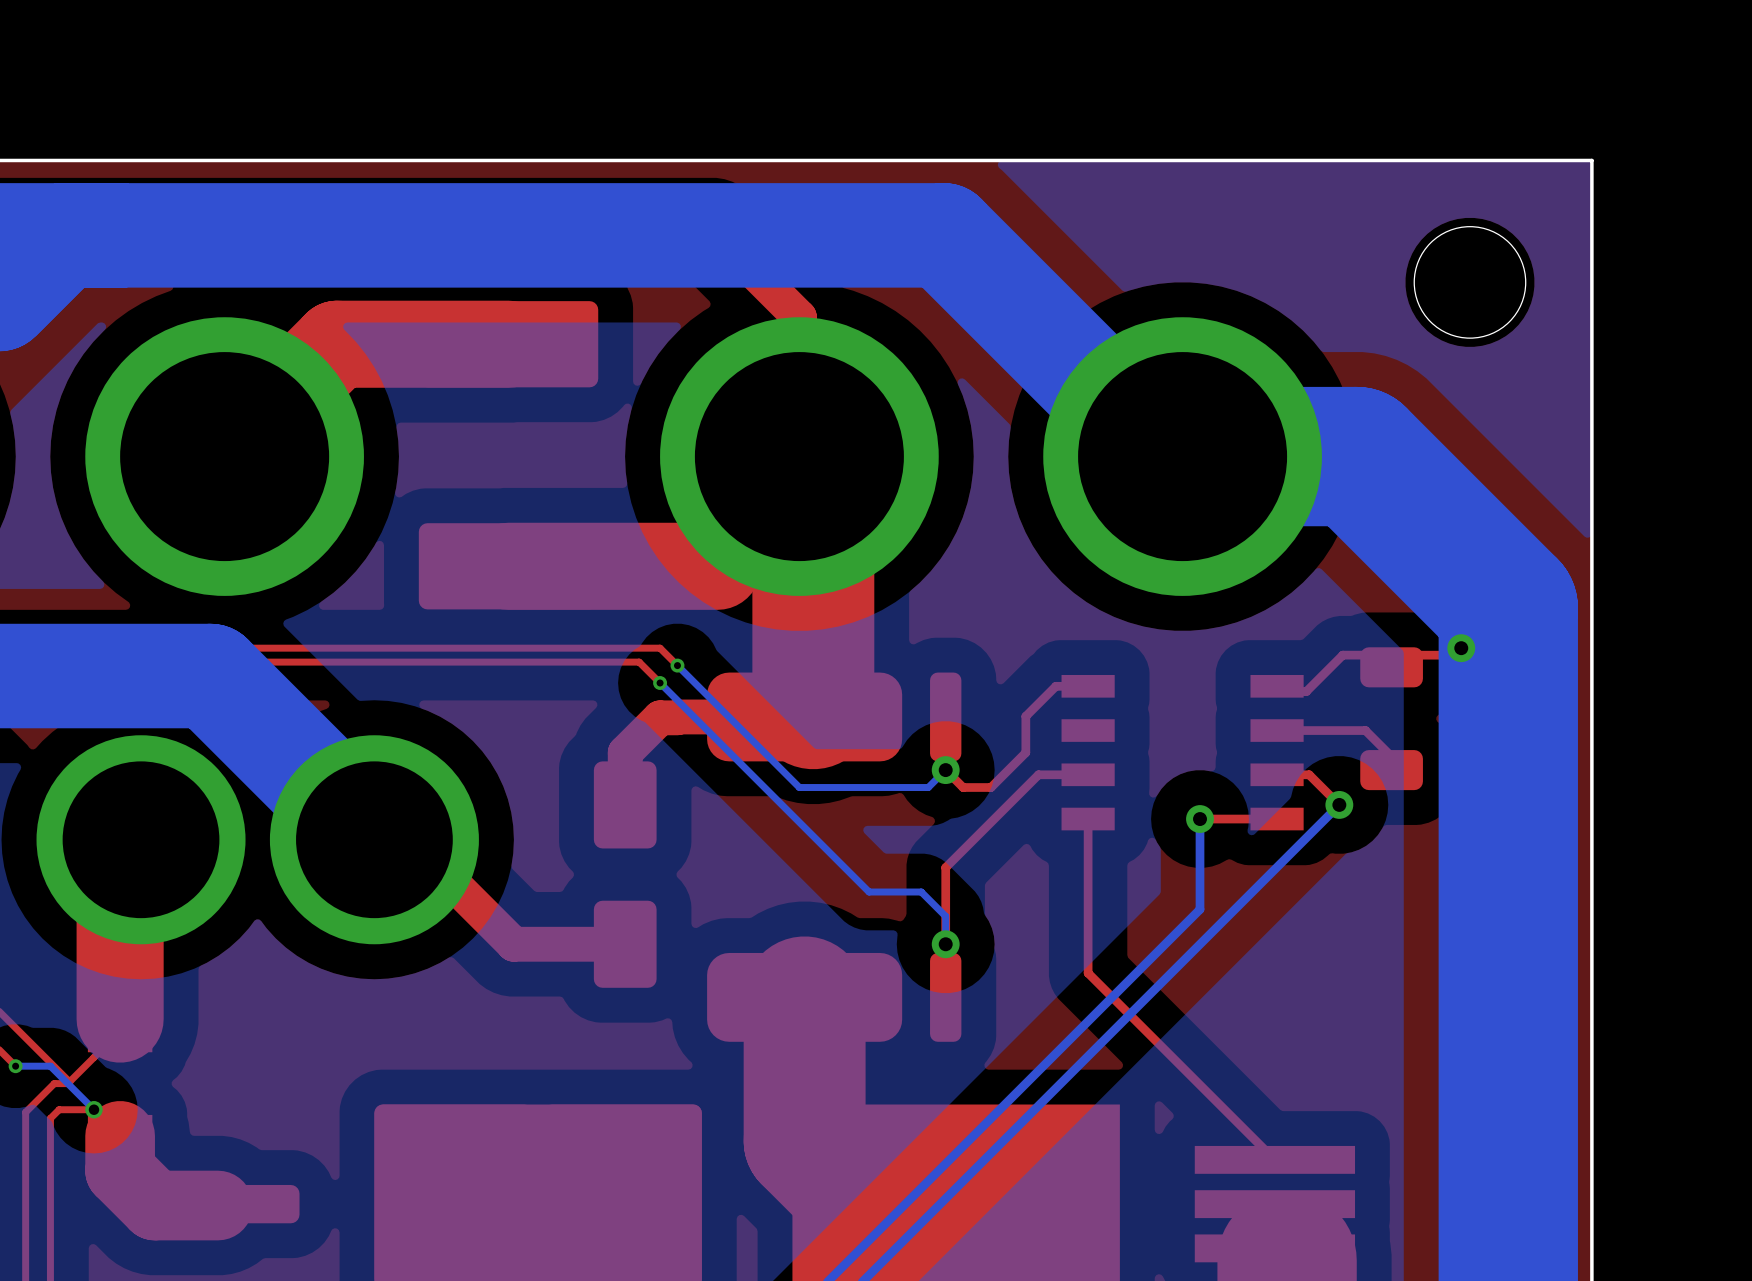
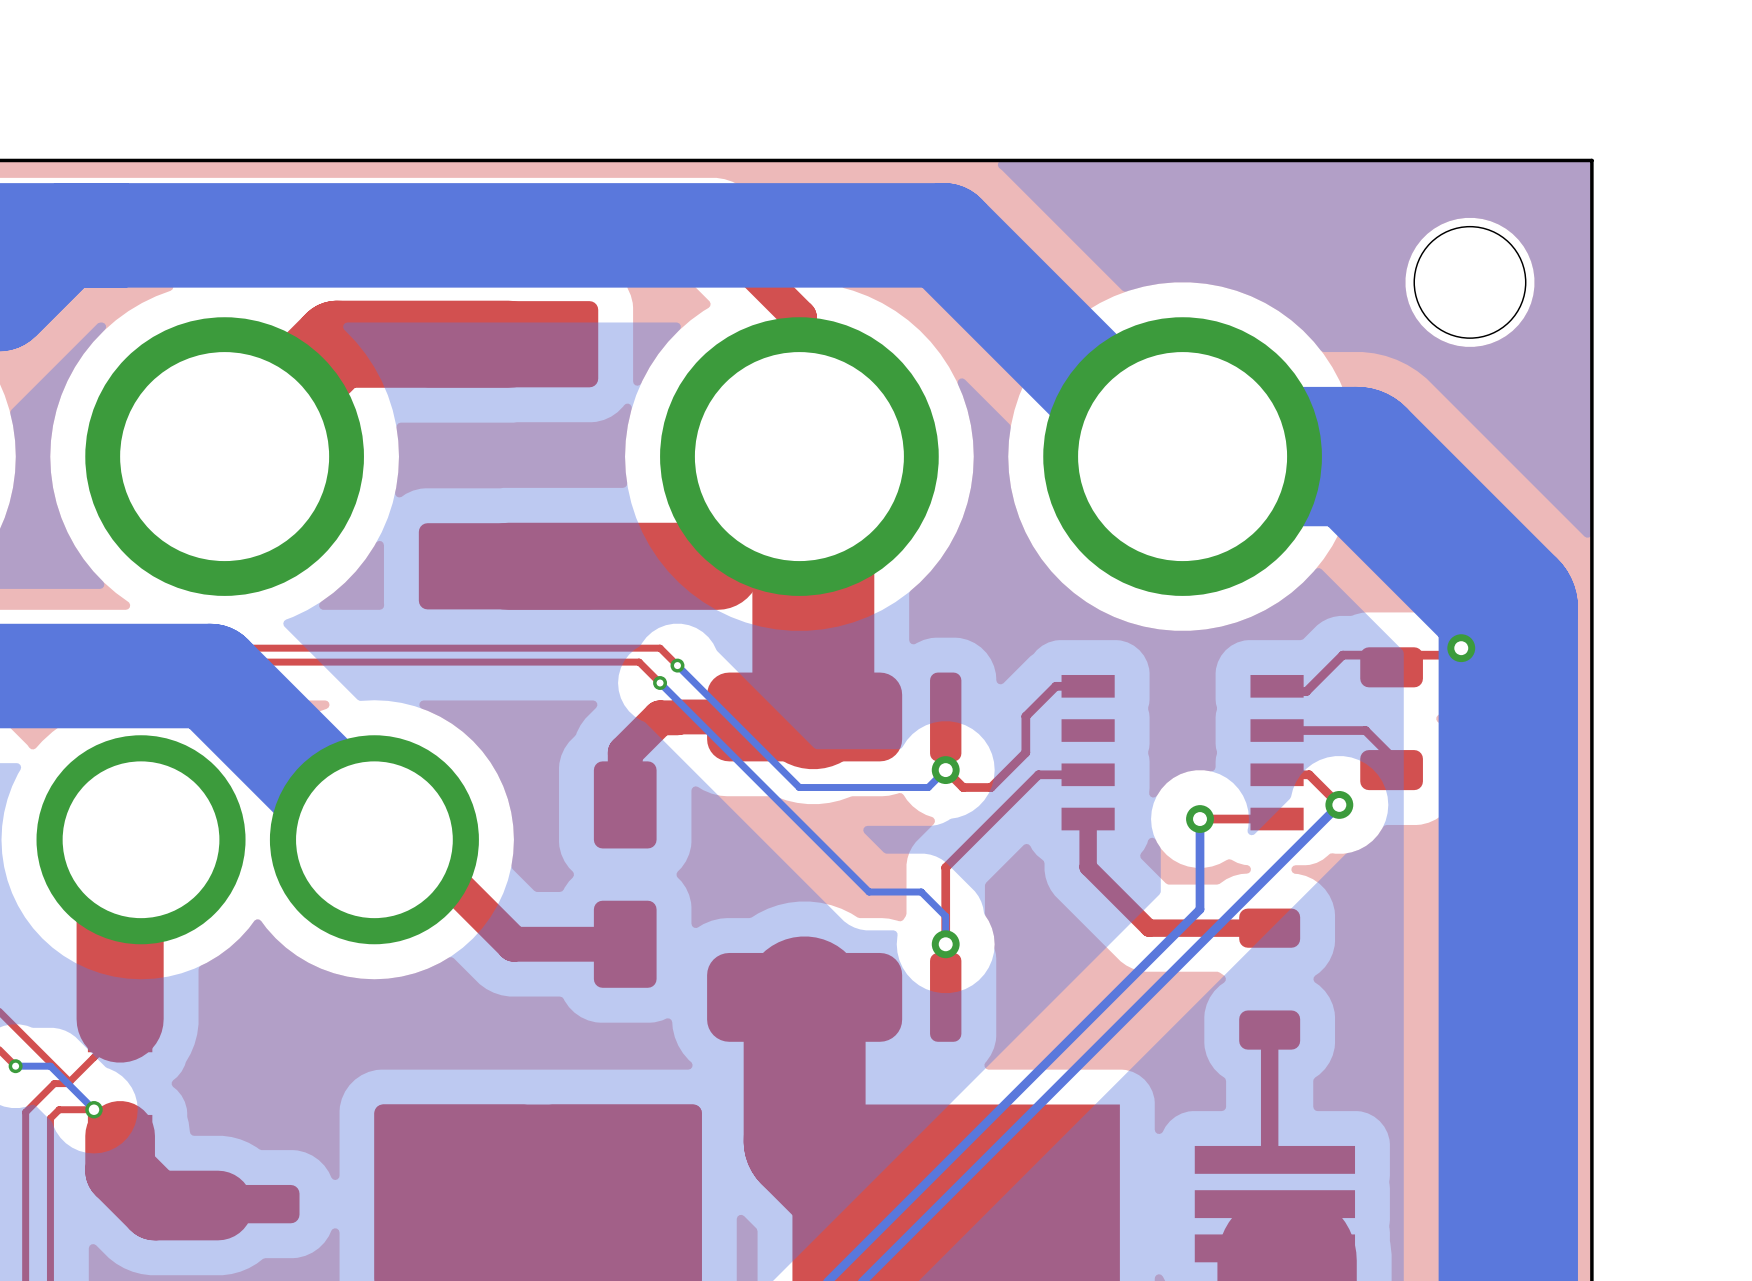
top track width: thin (1088, 819) (1088, 867) -> thick (1088, 819) (1088, 867)
top track: (1088, 867) (1088, 973) (1269, 1154) -> (1088, 867) (1149, 928) (1269, 928)
part: none -> (1269, 979)
top track: none -> (1269, 1030) (1269, 1154)

